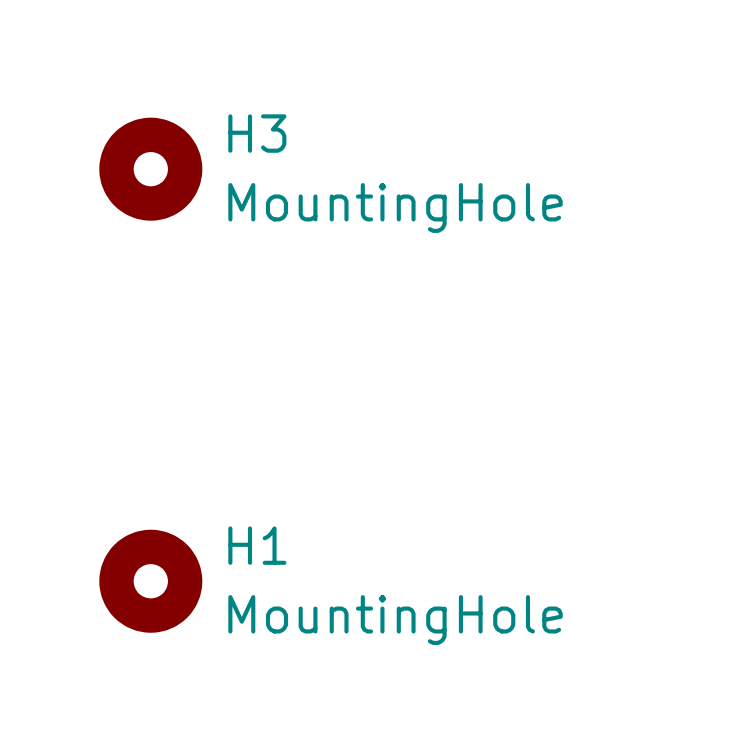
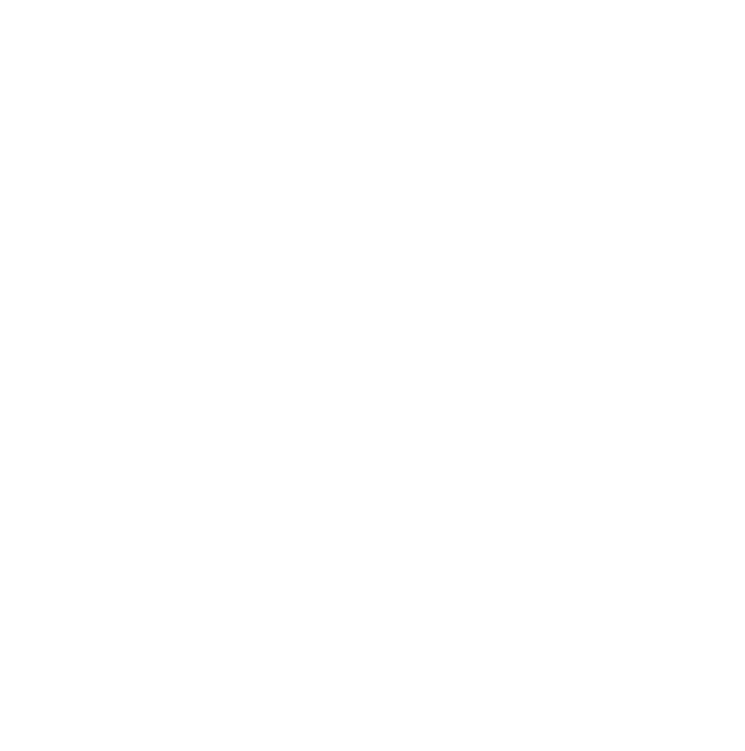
H3: MountingHole (150, 169) -> none
H1: MountingHole (150, 581) -> none

